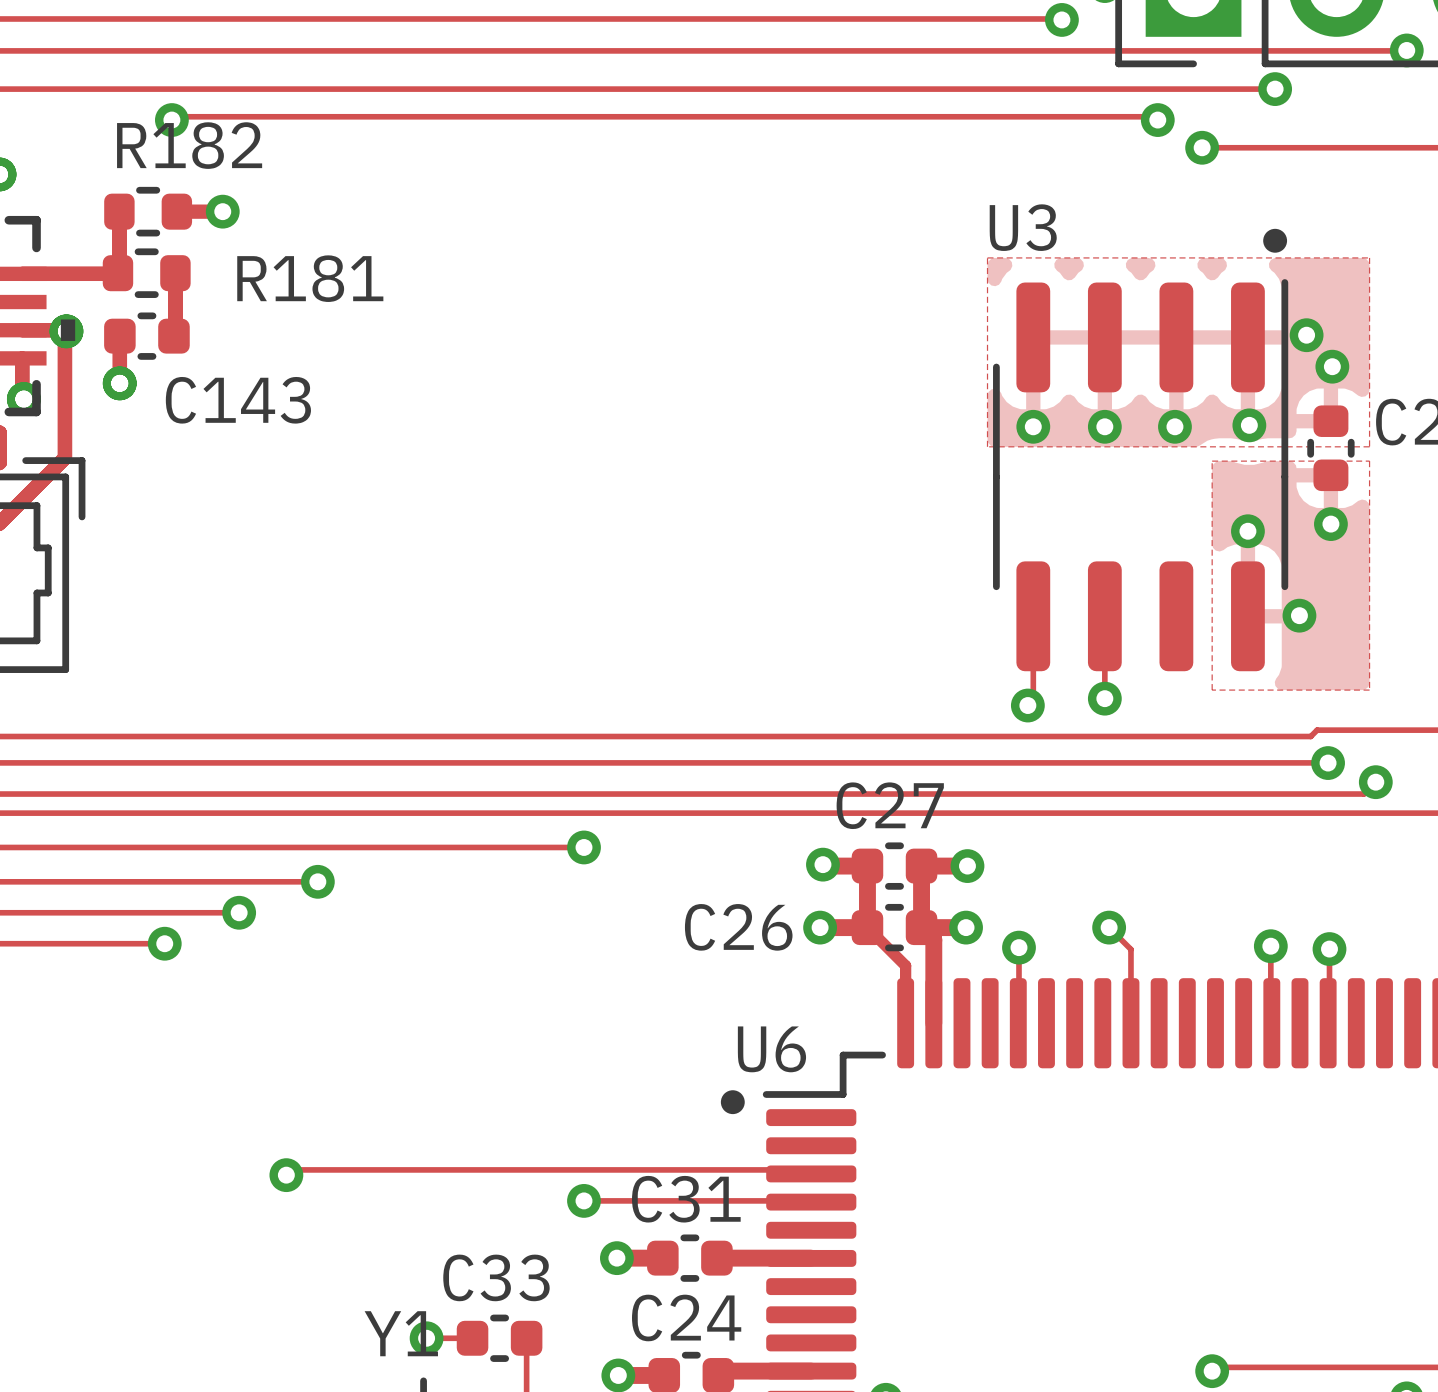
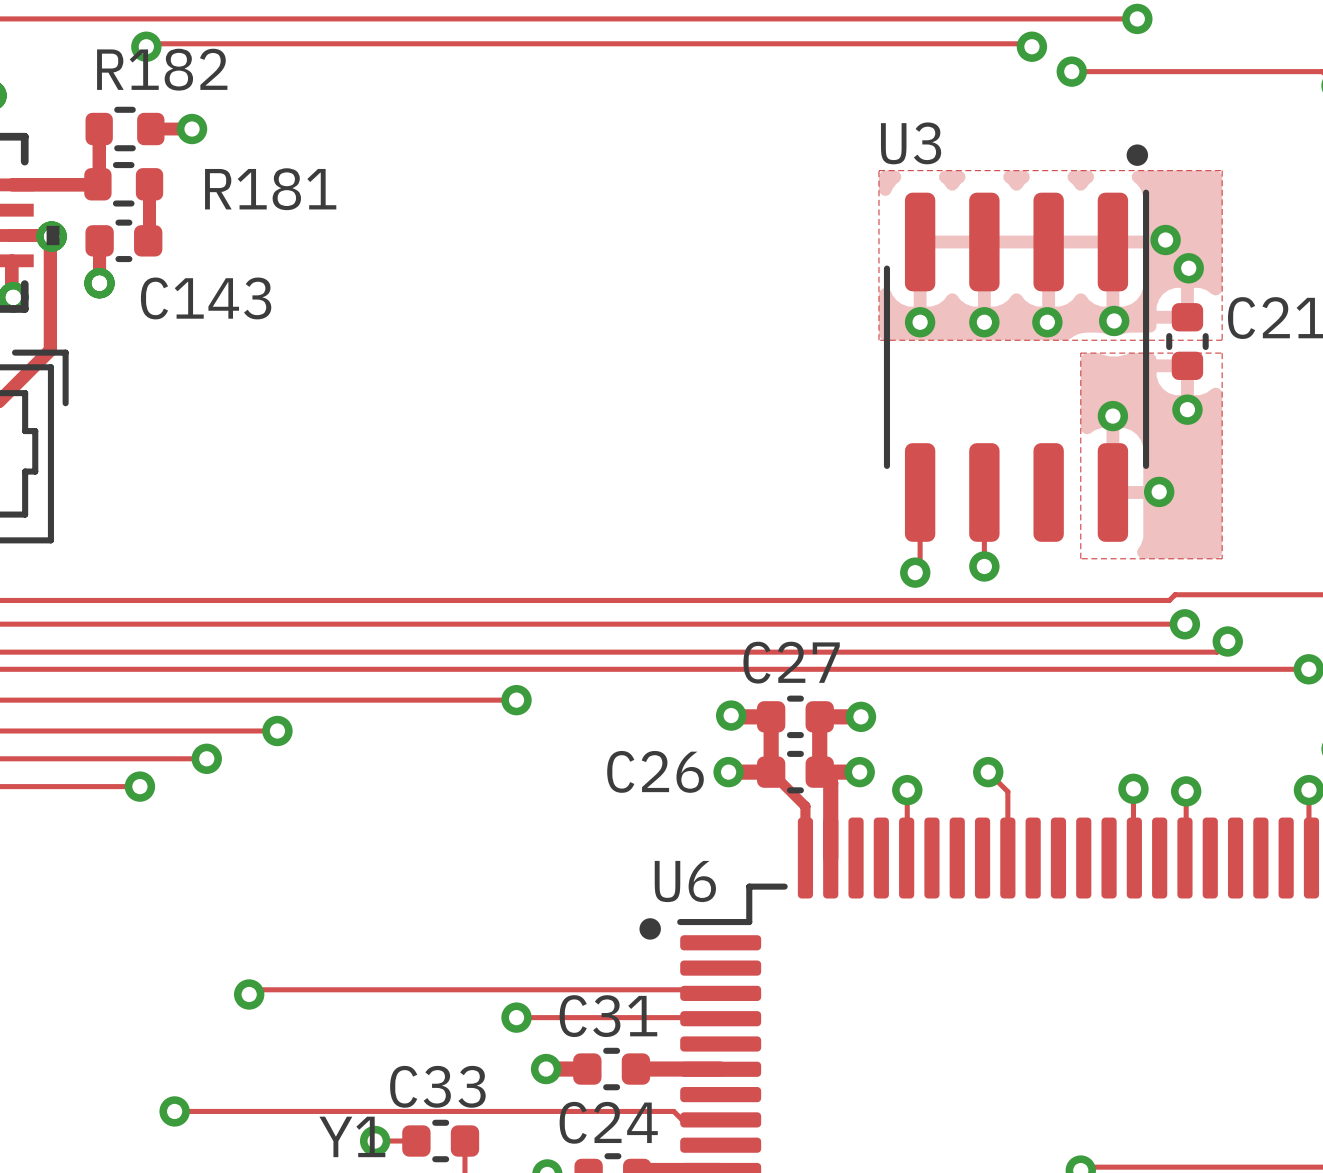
track: none -> (174, 1111) (673, 1111) (682, 1119) (720, 1119)
via: none -> (174, 1111)

